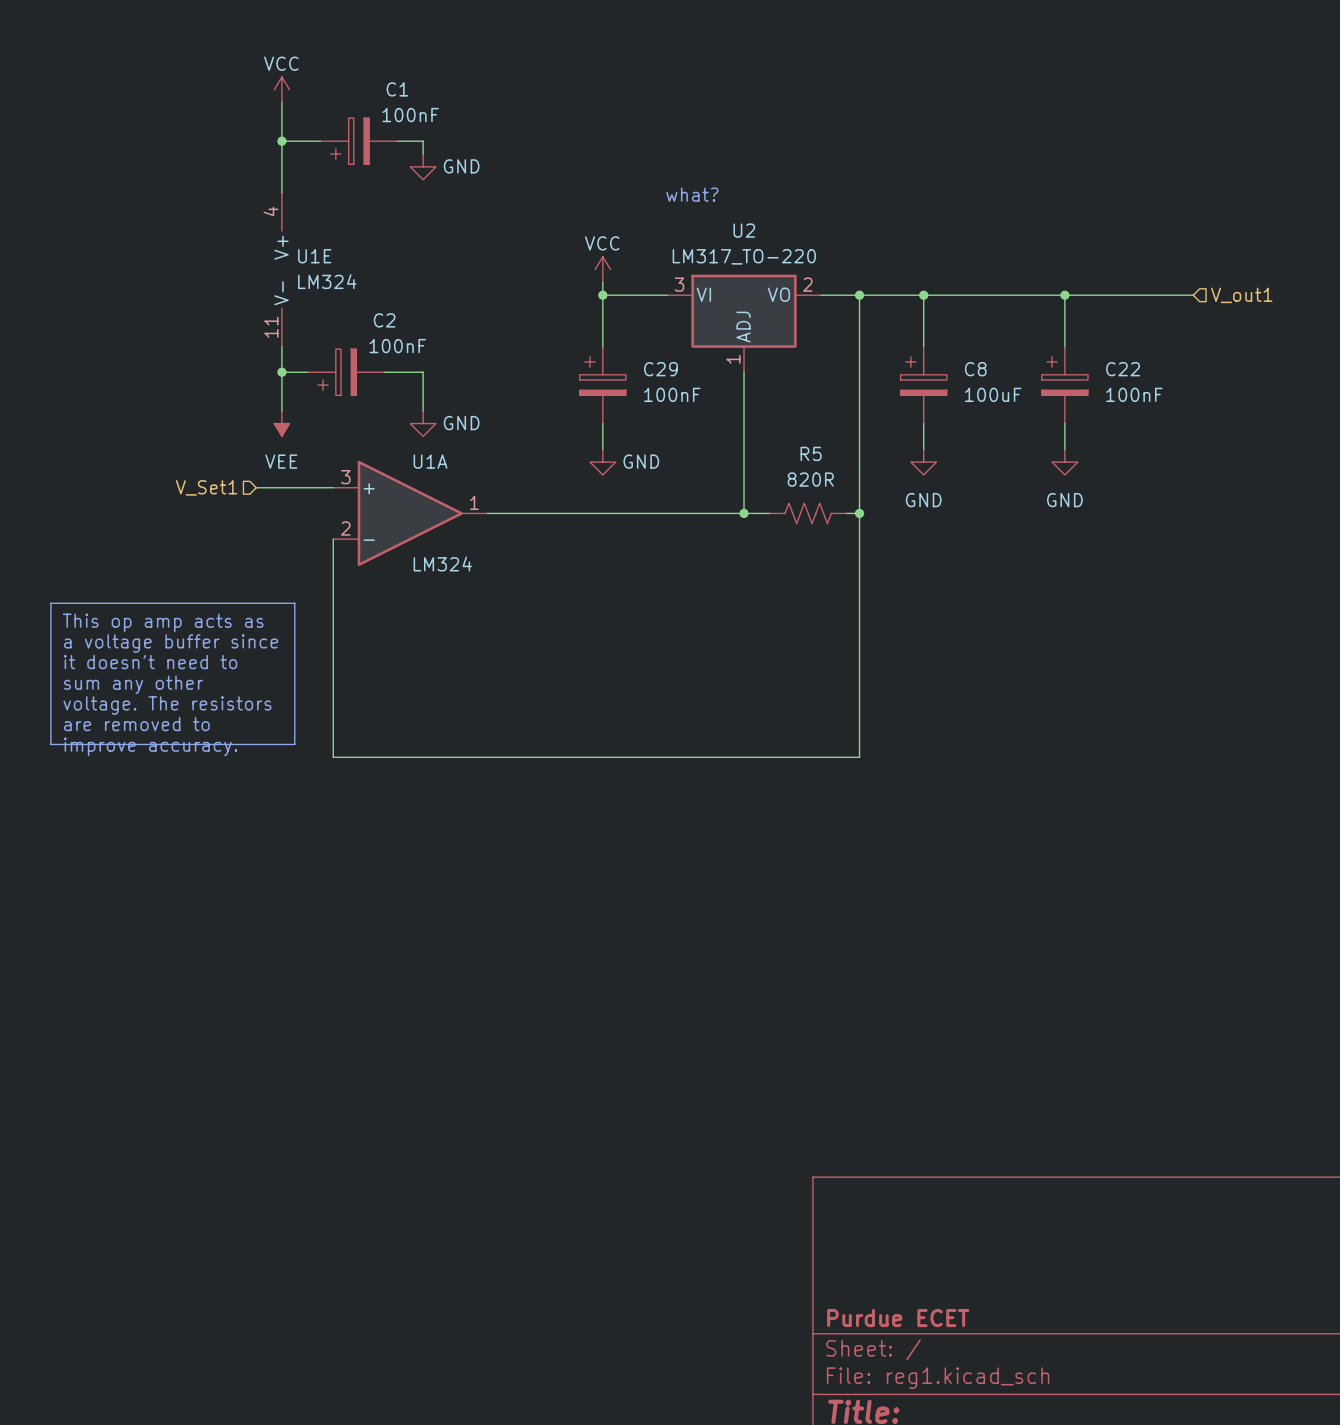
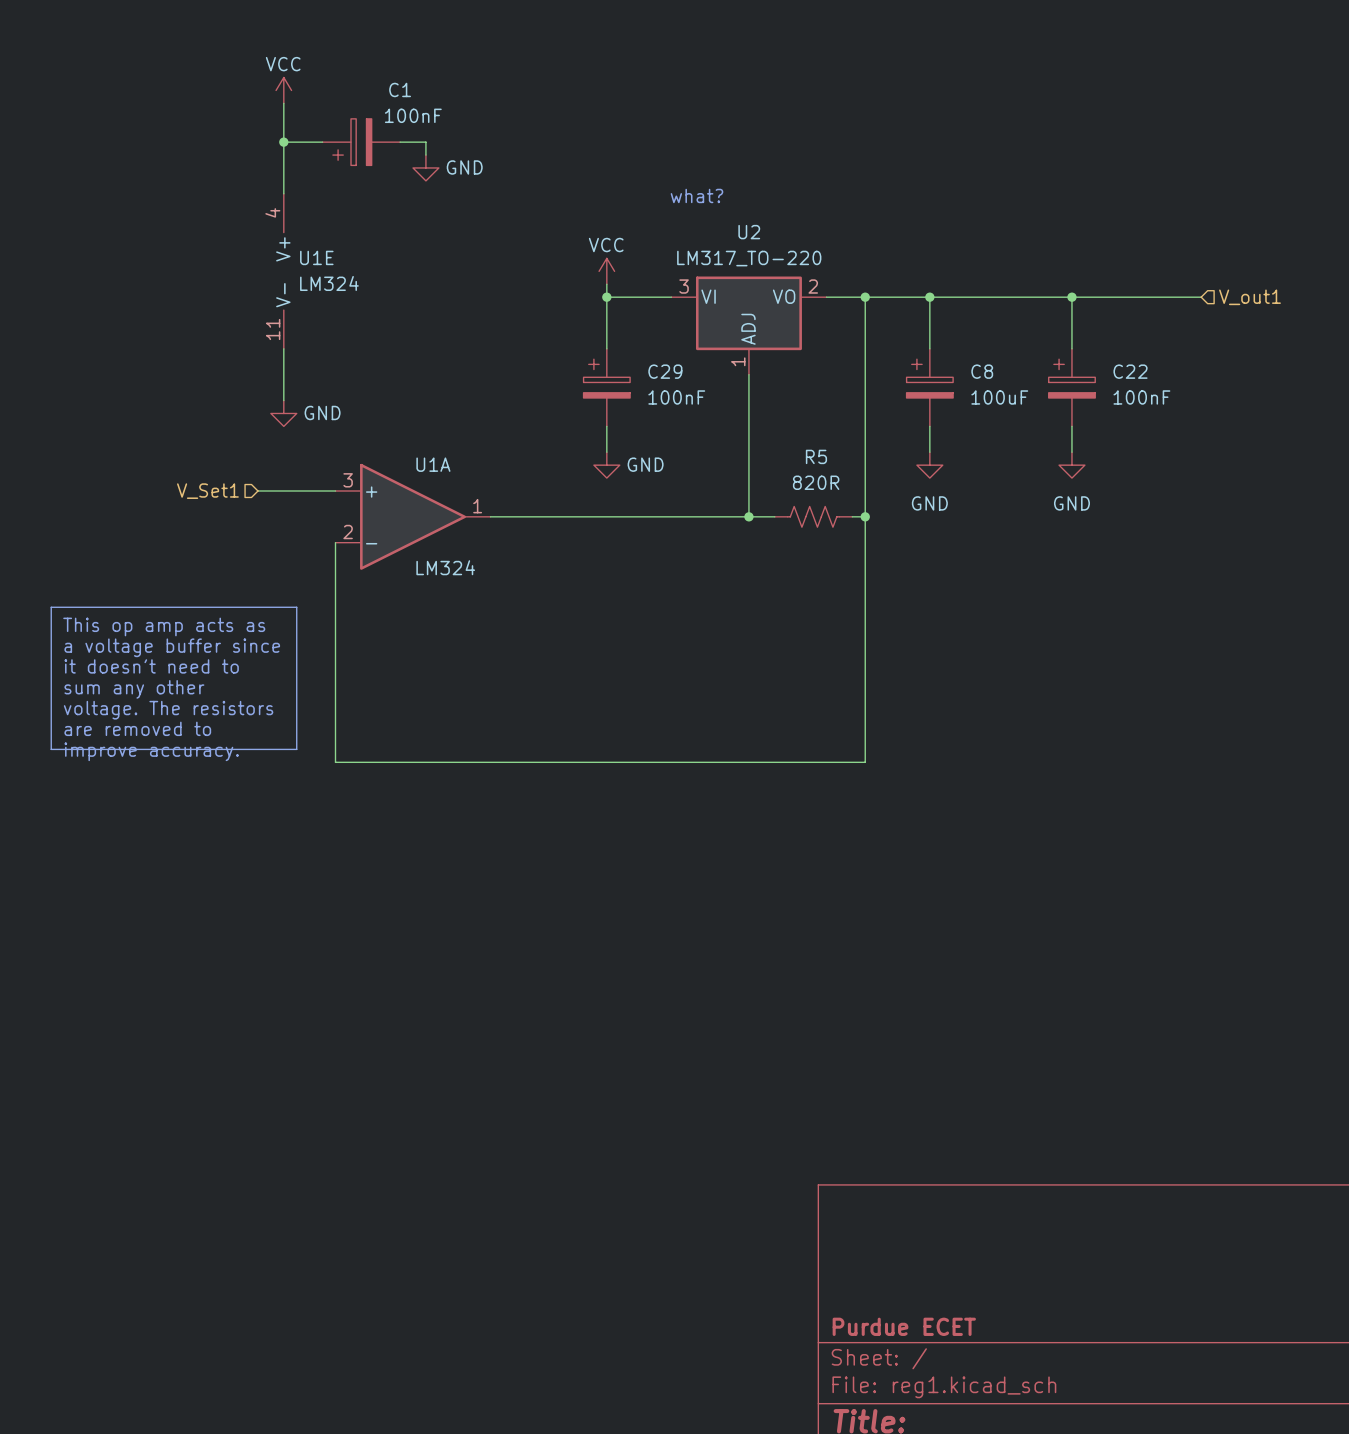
wire: (281, 372) (307, 372) -> none
junction: (281, 372) -> none
C2: 100nF (346, 372) -> none
wire: (384, 372) (423, 372) (423, 410) -> none
power symbol: VEE (281, 423) -> none
power symbol position: GND (423, 423) -> GND (283, 413)

